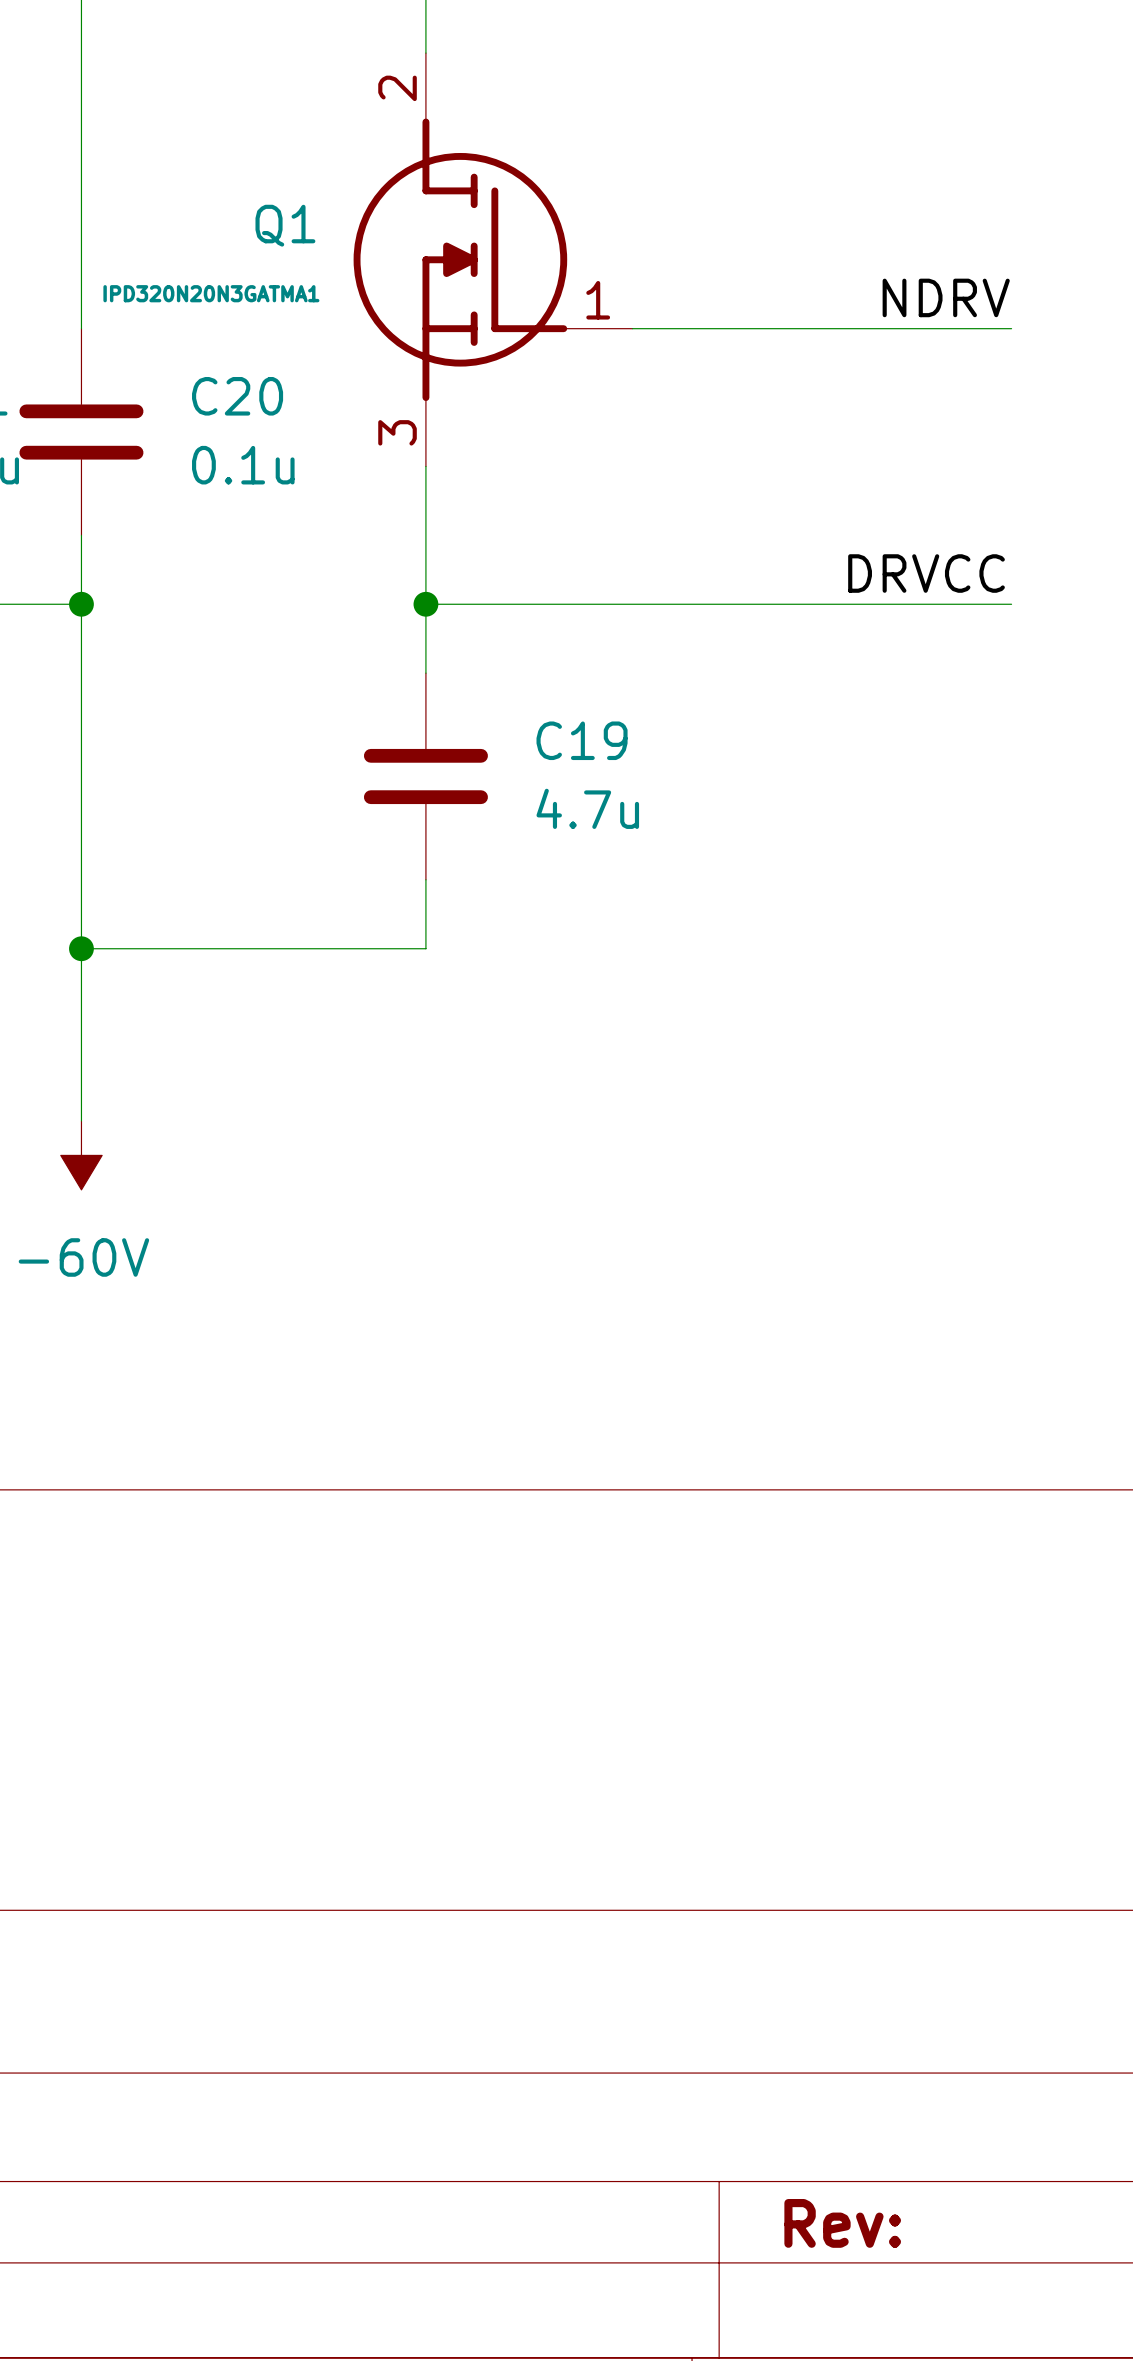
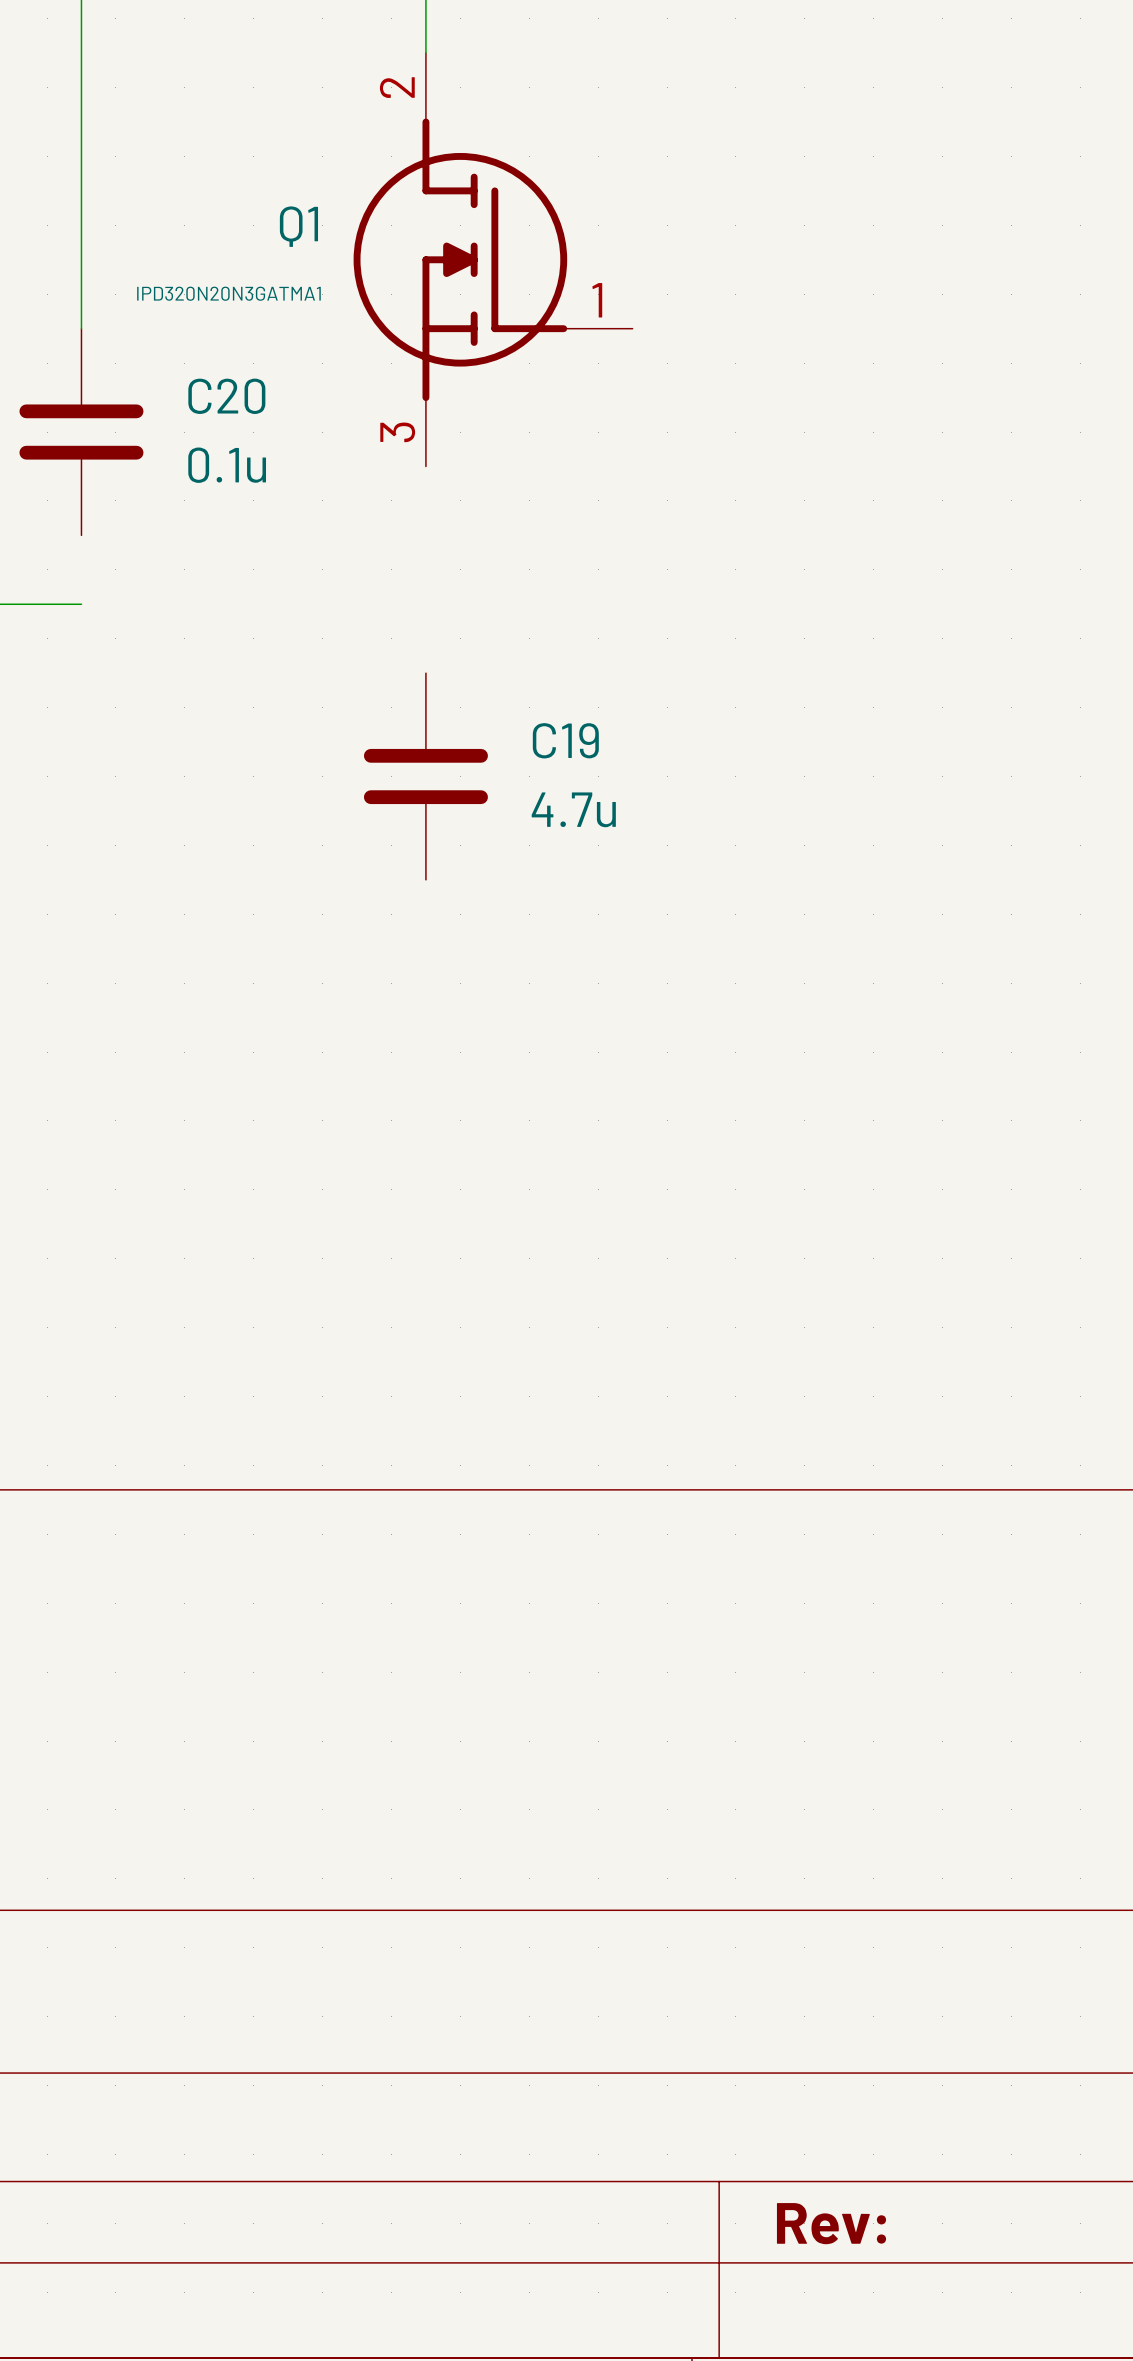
label: NDRV (946, 297) -> none
wire: (632, 328) (1011, 328) -> none
wire: (425, 466) (425, 673) -> none
wire: (81, 535) (81, 1120) -> none
label: DRVCC (926, 573) -> none
junction: (81, 604) -> none
wire: (425, 604) (1011, 604) -> none
junction: (425, 604) -> none
wire: (425, 879) (425, 948) (81, 948) -> none
junction: (81, 948) -> none
power symbol: -60V (81, 1155) -> none

